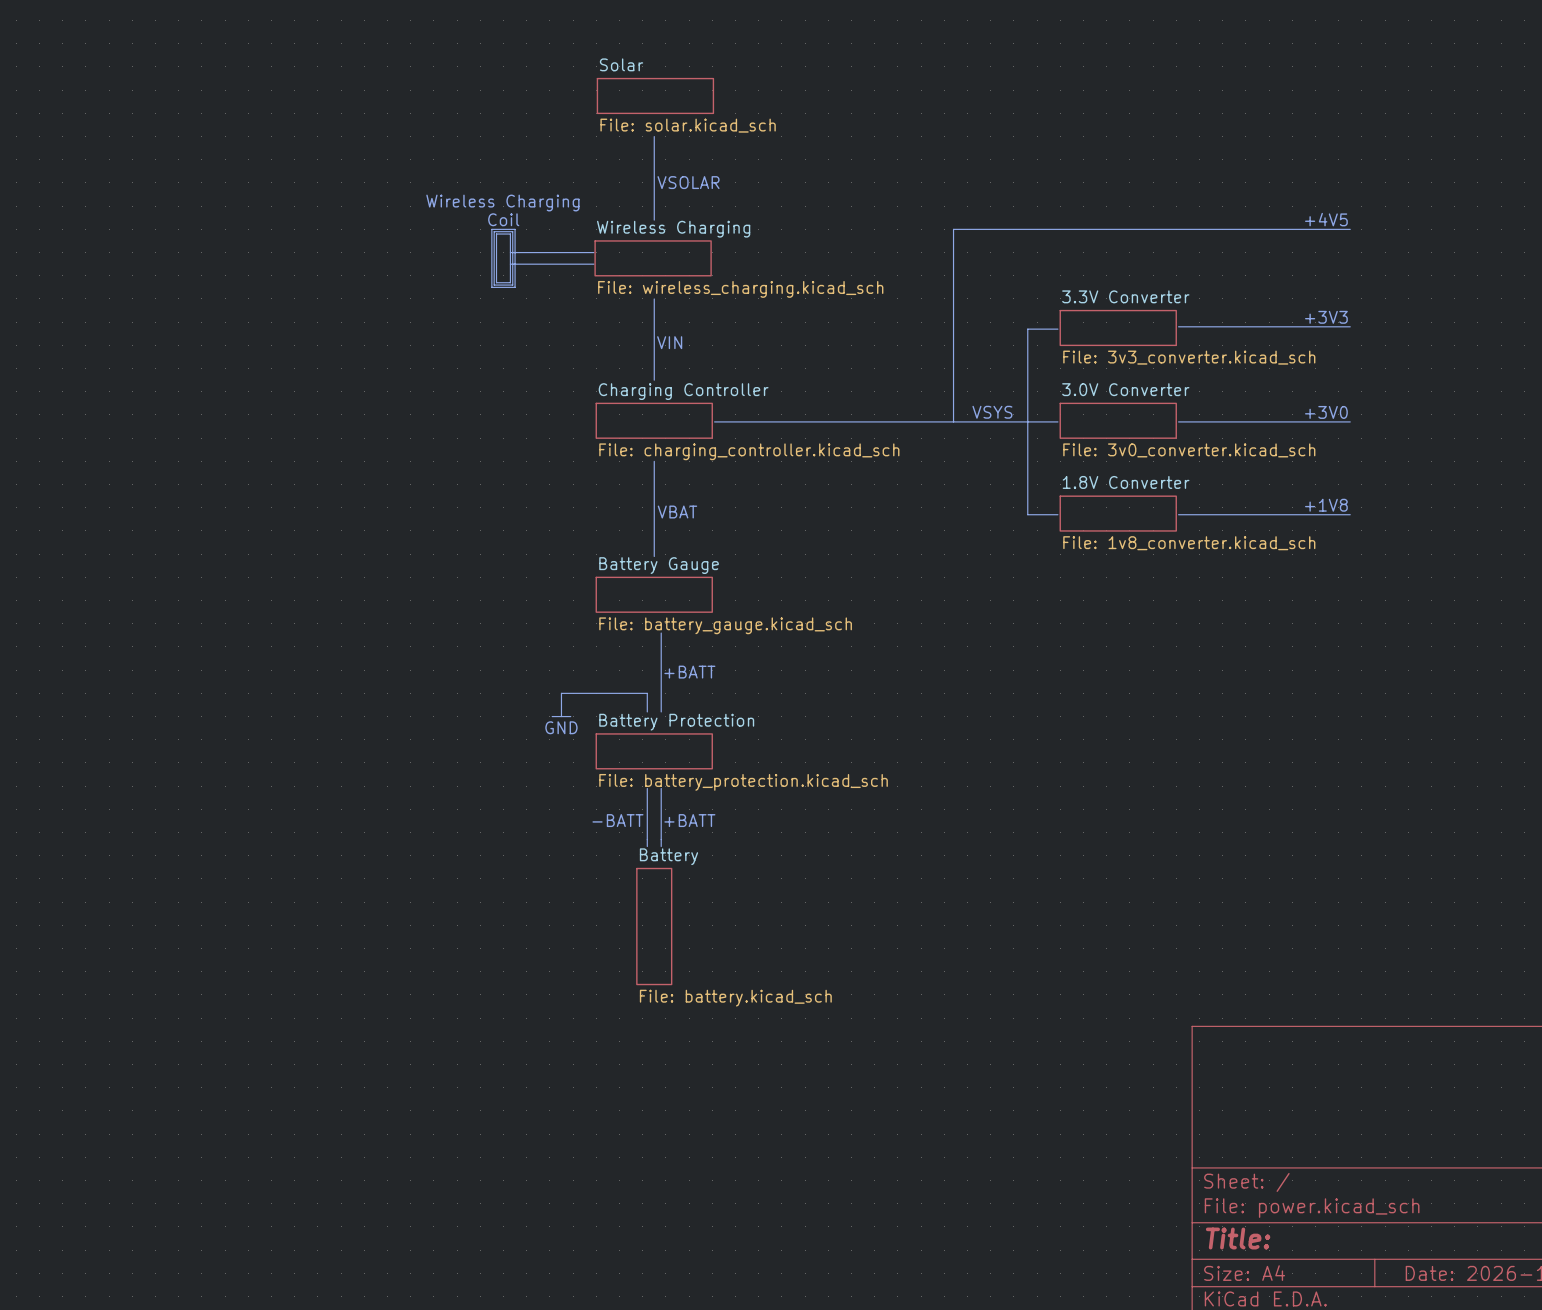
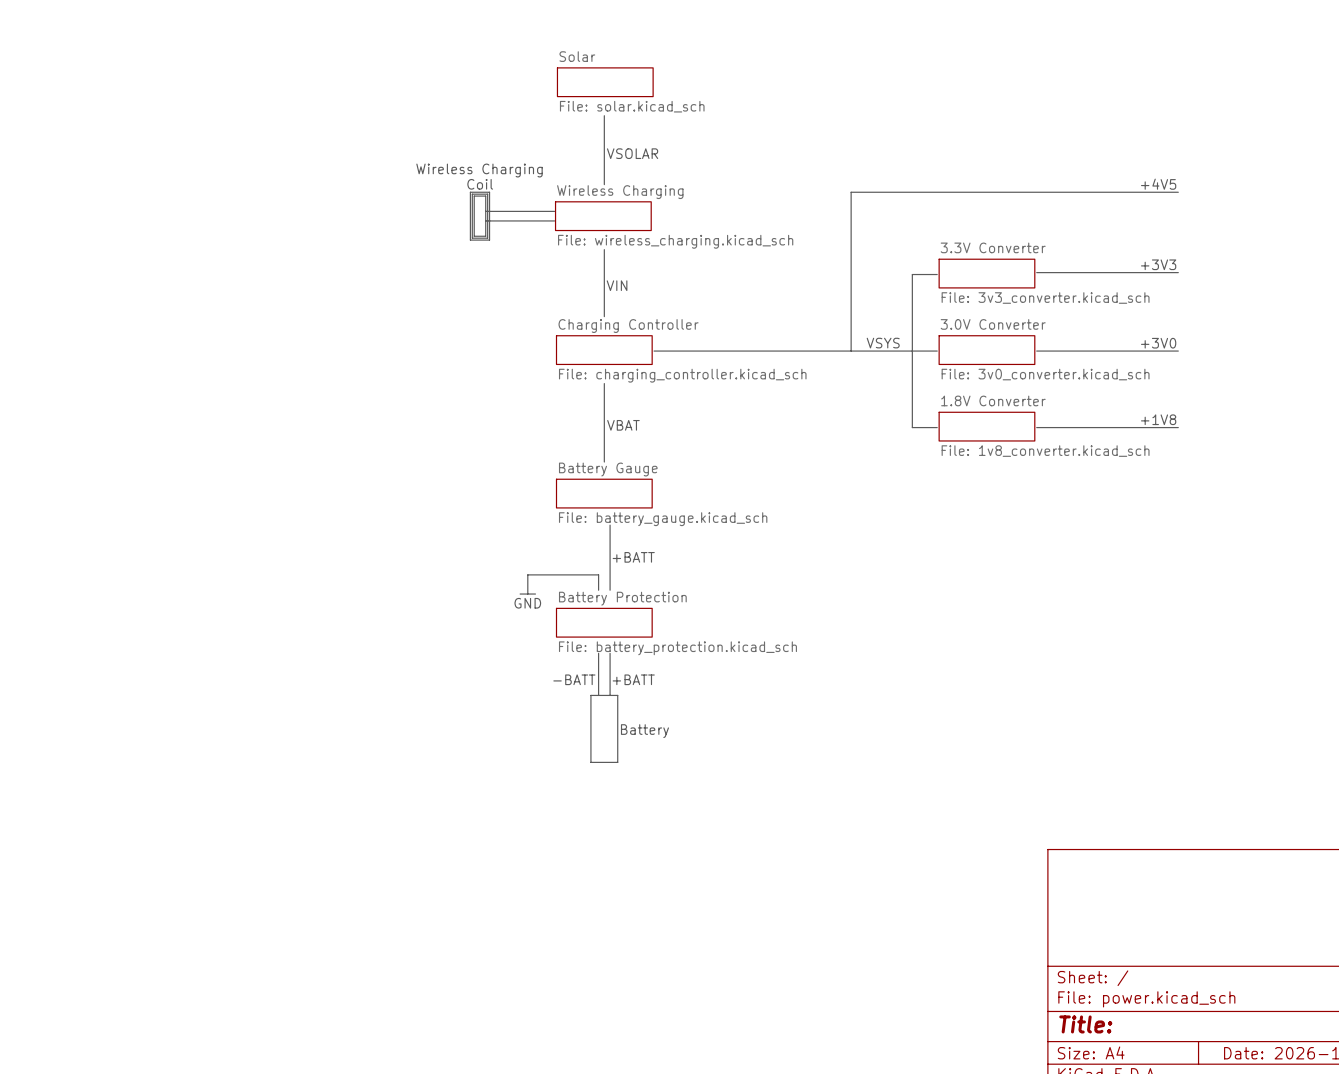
line: none -> (590, 695) (617, 695) (617, 762) (590, 762) (590, 695)
line: (647, 839) (647, 846) -> none
line: (661, 839) (661, 846) -> none
text: none -> Battery (644, 731)
sheet Battery: File: battery.kicad_sch (654, 926) -> none

